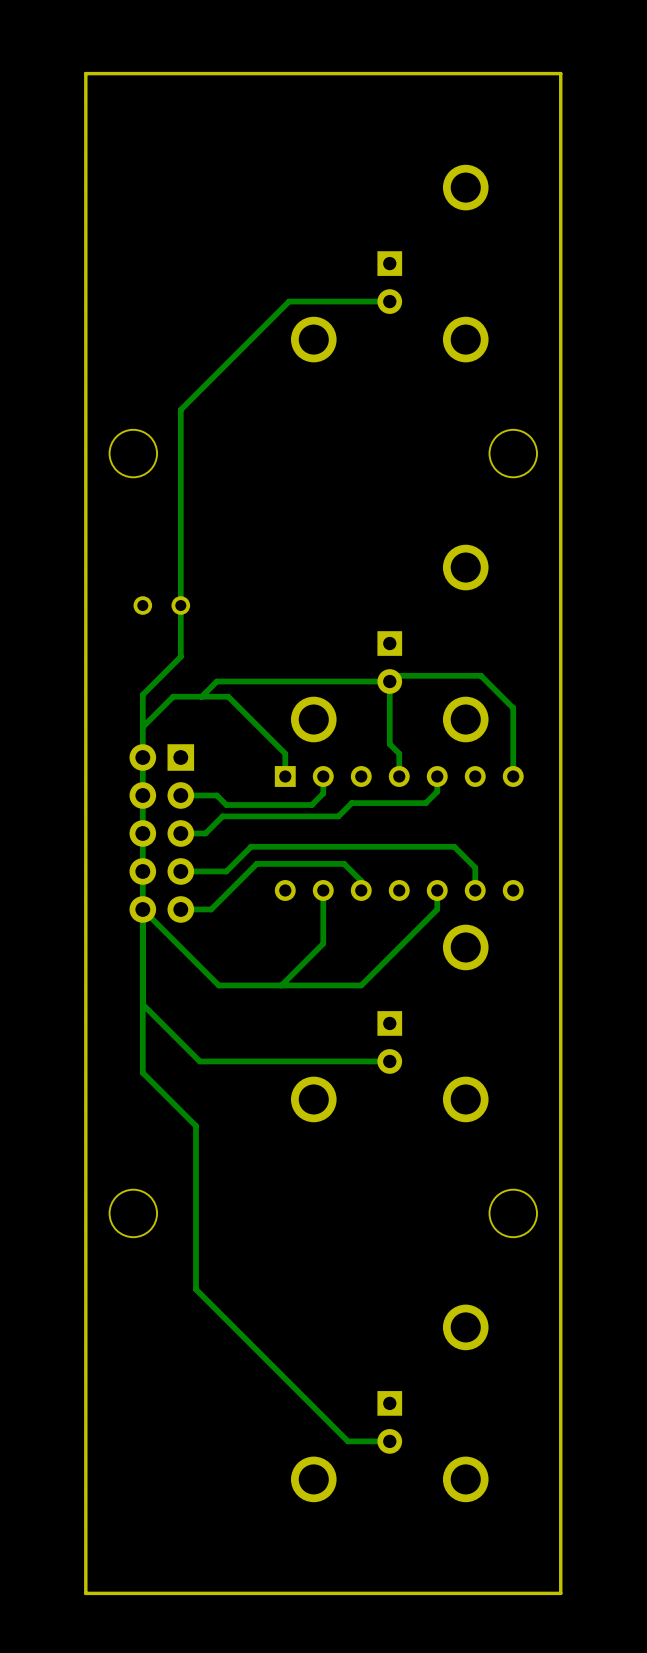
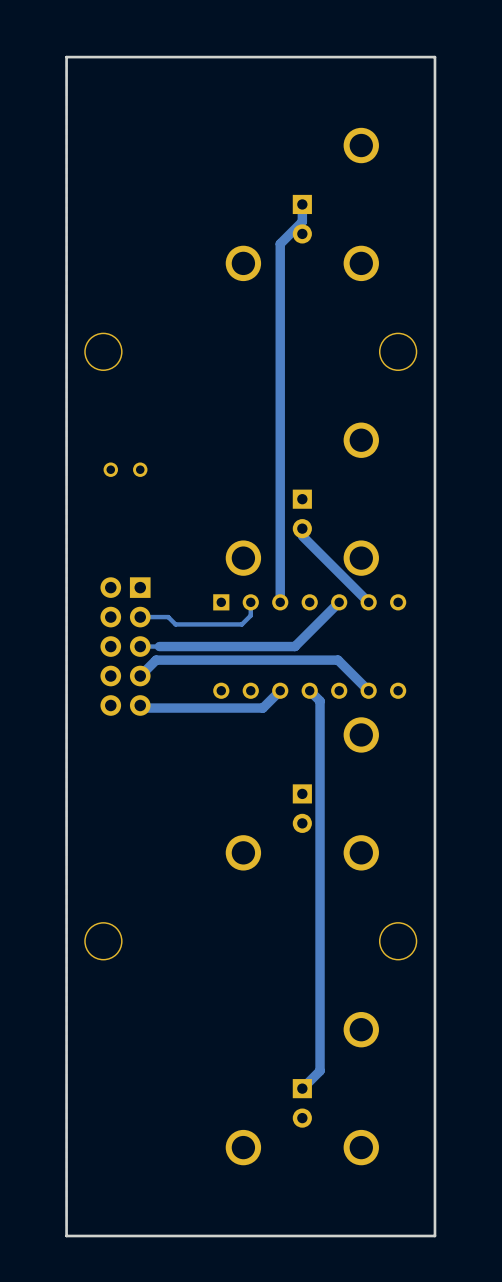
track: none -> (302, 204) (302, 221) (280, 243) (280, 602)
track: (389, 301) (289, 301) (180, 409) (180, 656) (142, 694) (142, 1072) (196, 1126) (196, 1289) (347, 1441) (389, 1441) -> none
track: (389, 691) (389, 744) (399, 753) (399, 776) -> (302, 536) (368, 602)
track: (201, 696) (216, 681) (389, 681) (395, 675) (480, 675) (513, 708) (513, 776) -> none
track: (142, 727) (173, 696) (228, 696) (285, 753) (285, 776) -> none
track: (437, 776) (437, 791) (425, 803) (351, 803) (338, 816) (222, 816) (205, 833) -> (339, 602) (294, 646) (159, 646)
track: (180, 871) (226, 871) (251, 846) (454, 846) (475, 867) (475, 890) -> (140, 676) (156, 660) (338, 660) (368, 690)
track: (323, 890) (323, 943) (281, 985) -> none
track: (361, 890) (361, 880) (344, 863) (256, 863) (211, 909) (180, 909) -> (280, 690) (262, 708) (142, 708) (140, 705)
track: none -> (309, 690) (320, 701) (320, 1070) (302, 1088)
track: (437, 890) (437, 909) (361, 985) (218, 985) (142, 909) -> none
track: (142, 1004) (199, 1061) (389, 1061) -> none

